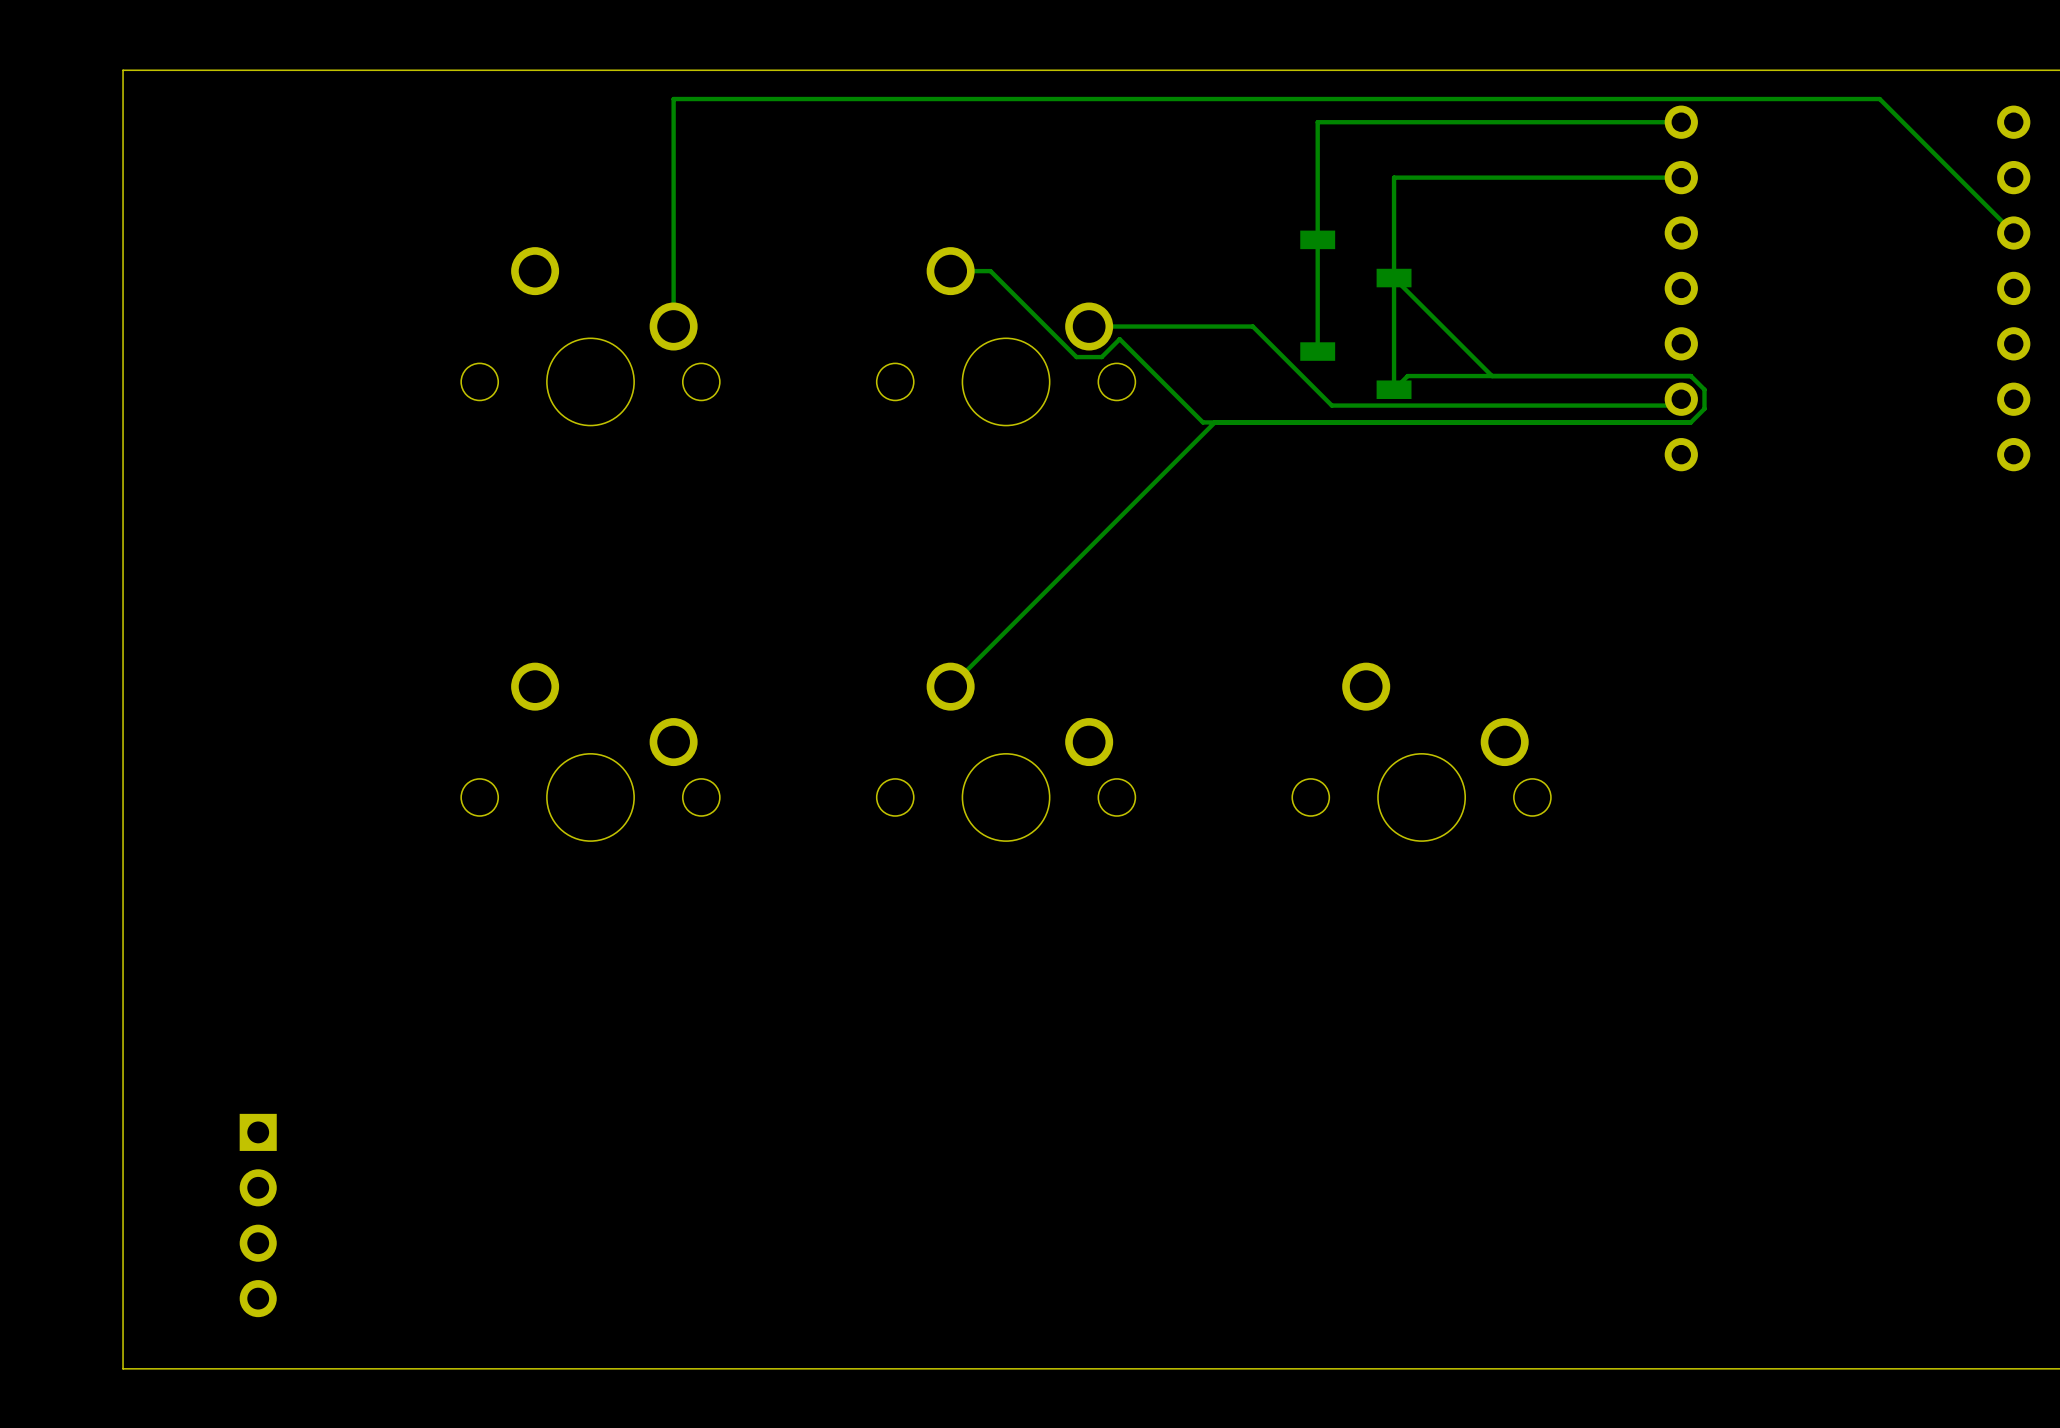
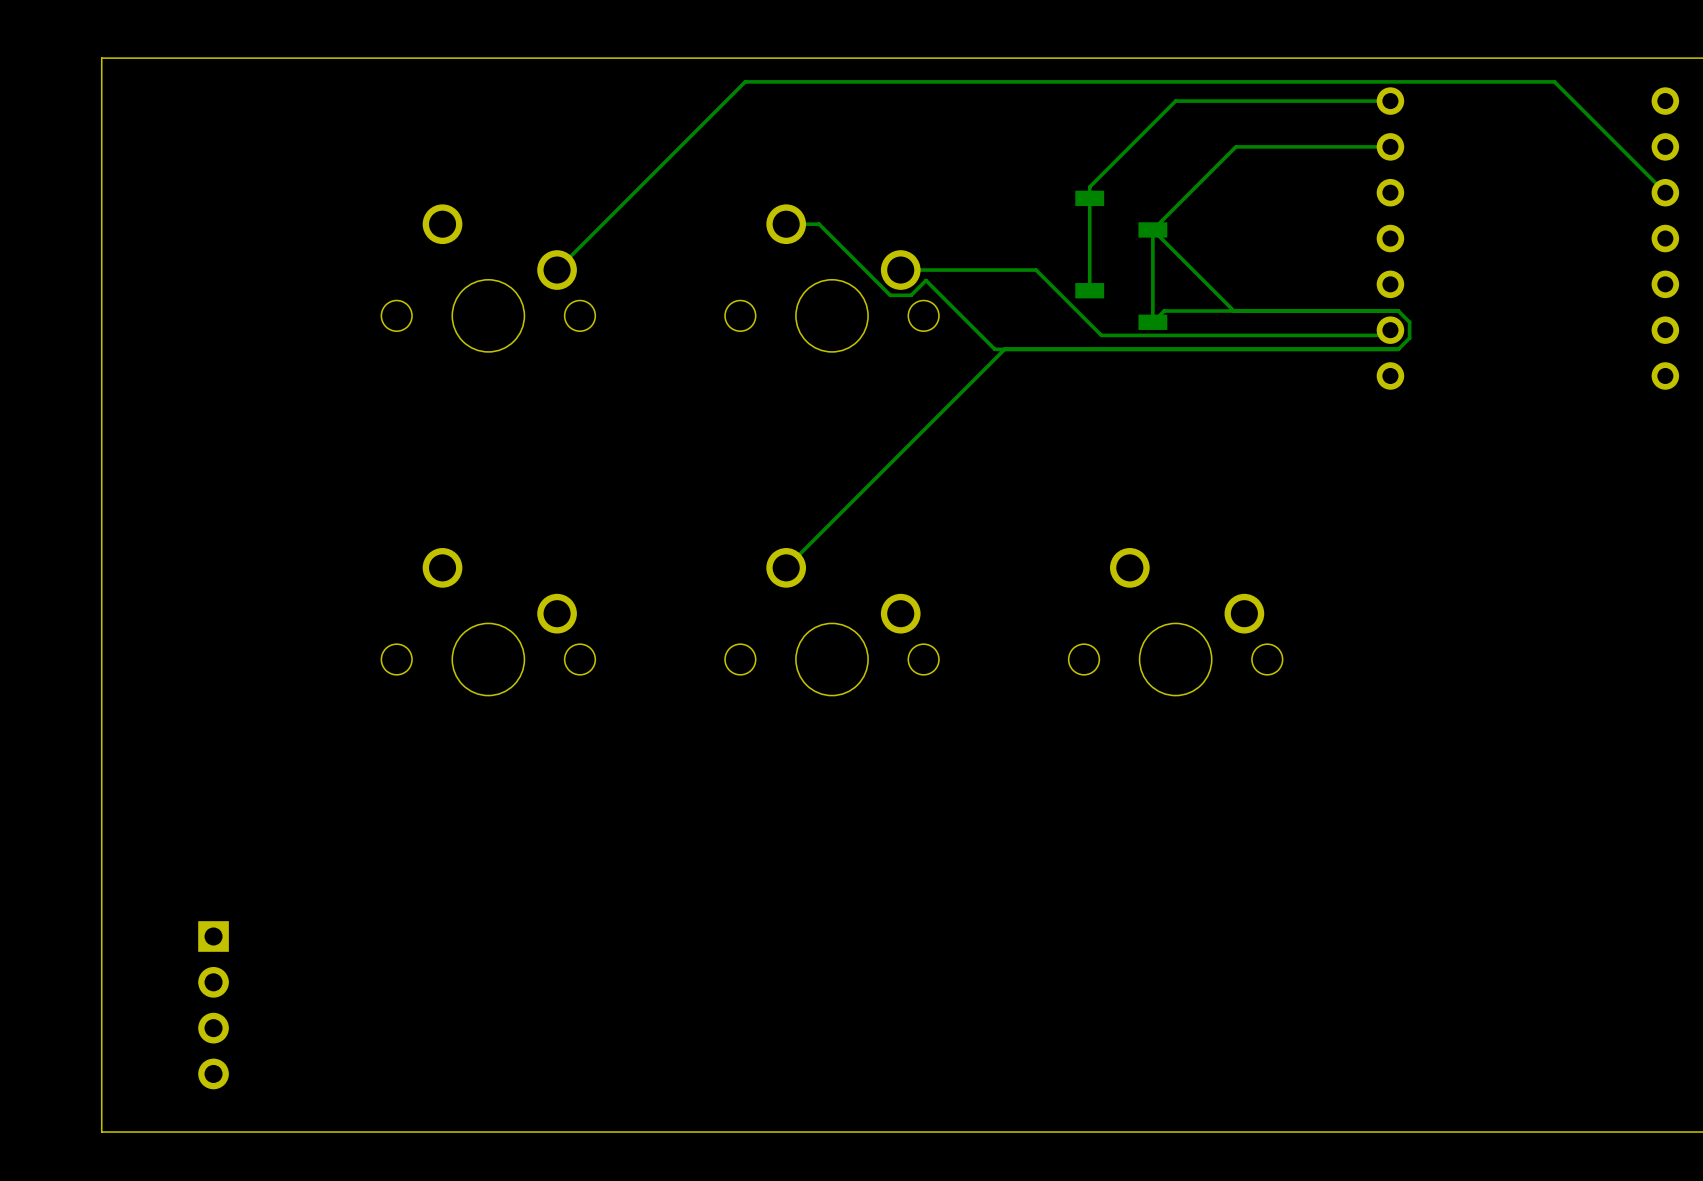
track: (901, 99) (673, 99) (673, 326) -> (745, 81) (557, 270)
track: (1421, 122) (1317, 122) (1317, 226) -> (1175, 101) (1089, 186)
track: (1494, 177) (1394, 177) (1394, 278) -> (1235, 146) (1152, 229)

